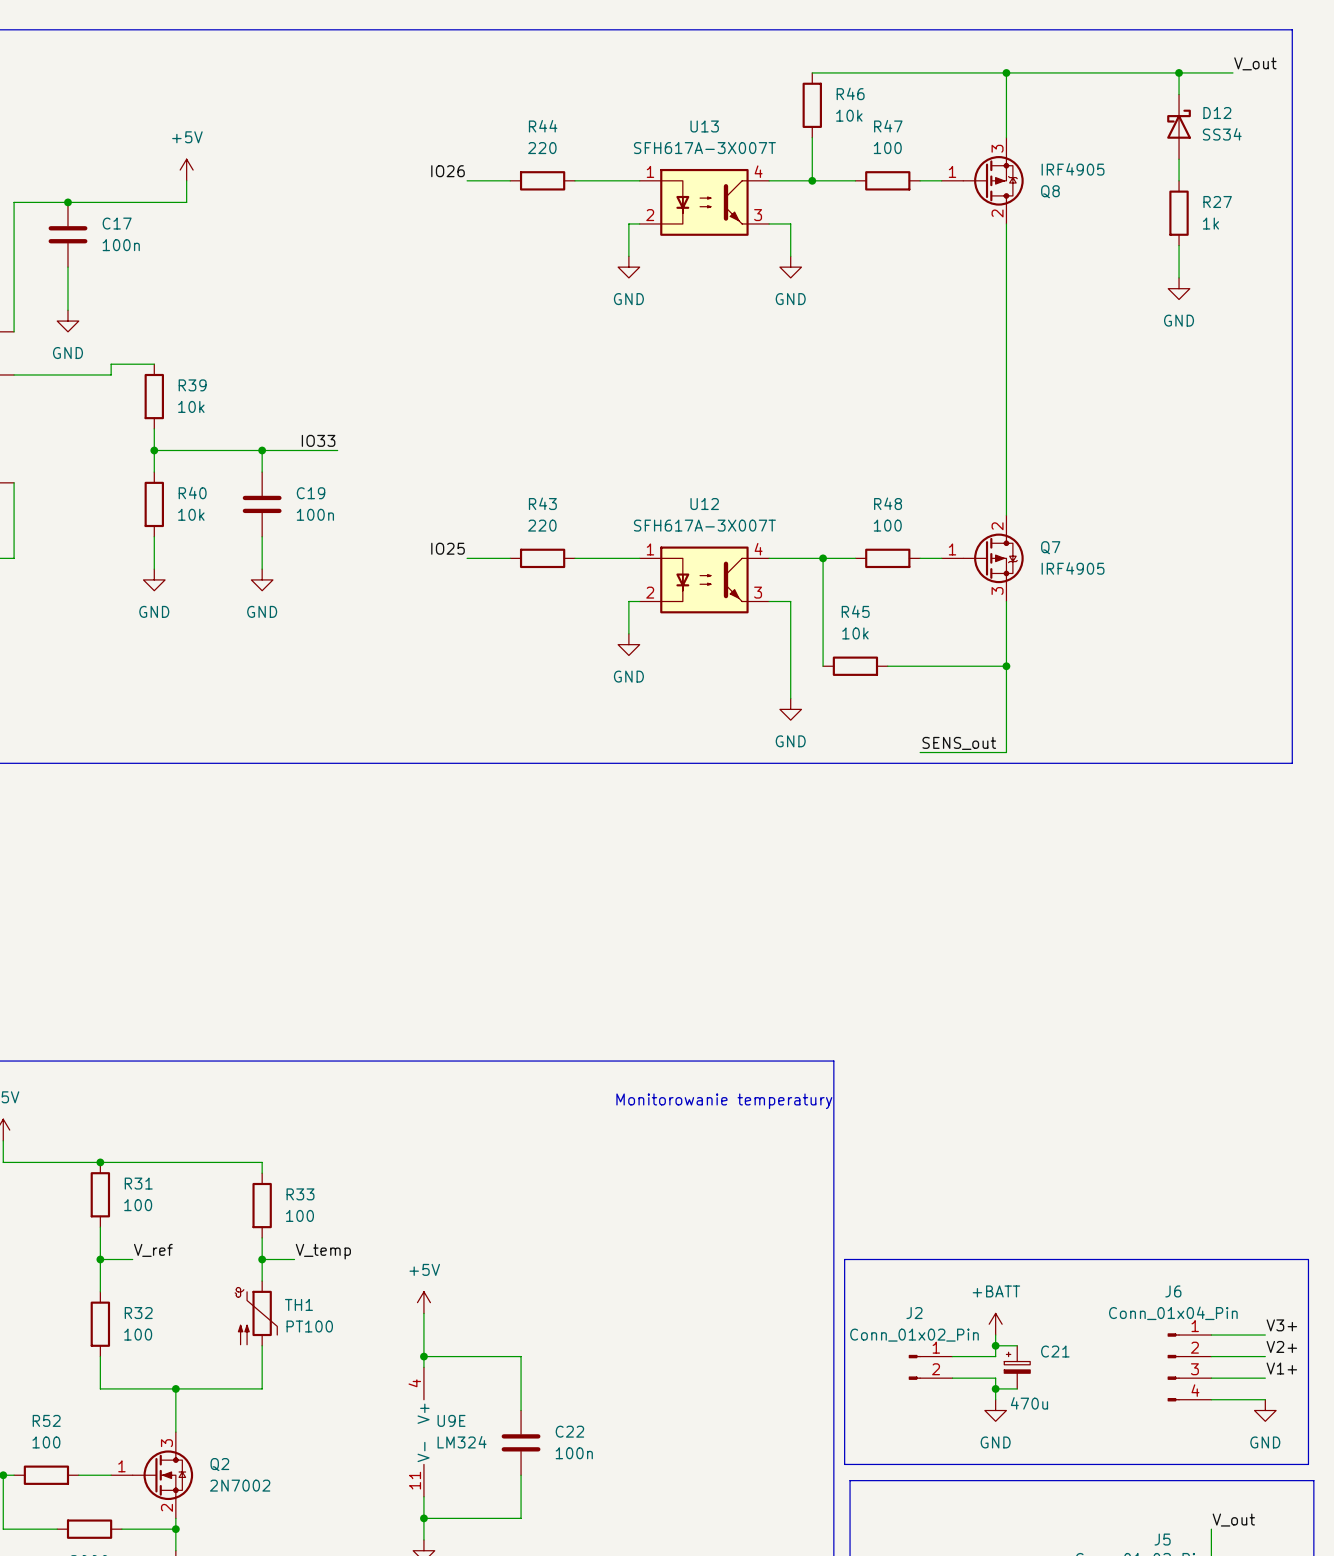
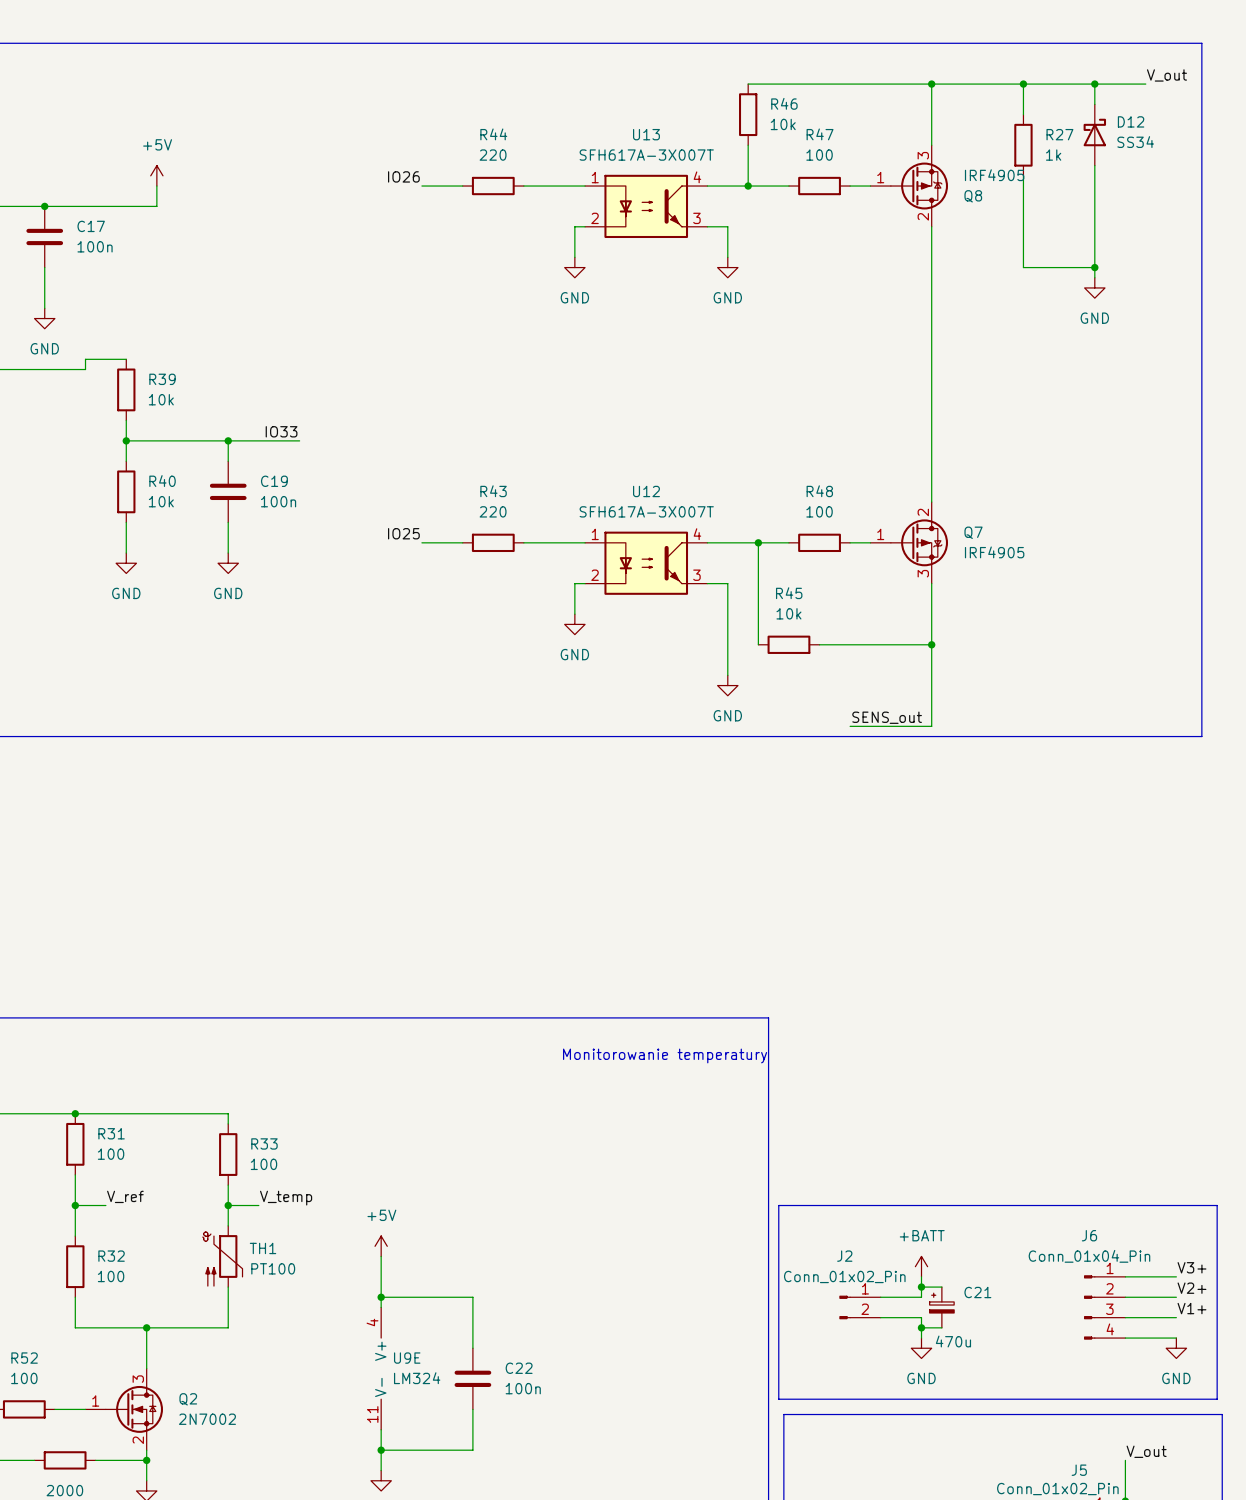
wire: none -> (1023, 84) (1023, 114)
junction: none -> (1023, 84)
wire: none -> (1023, 175) (1023, 267) (1094, 267)
wire: none -> (1094, 186) (1094, 247)
R27 position: (1179, 213) -> (1023, 145)
junction: none -> (1094, 267)

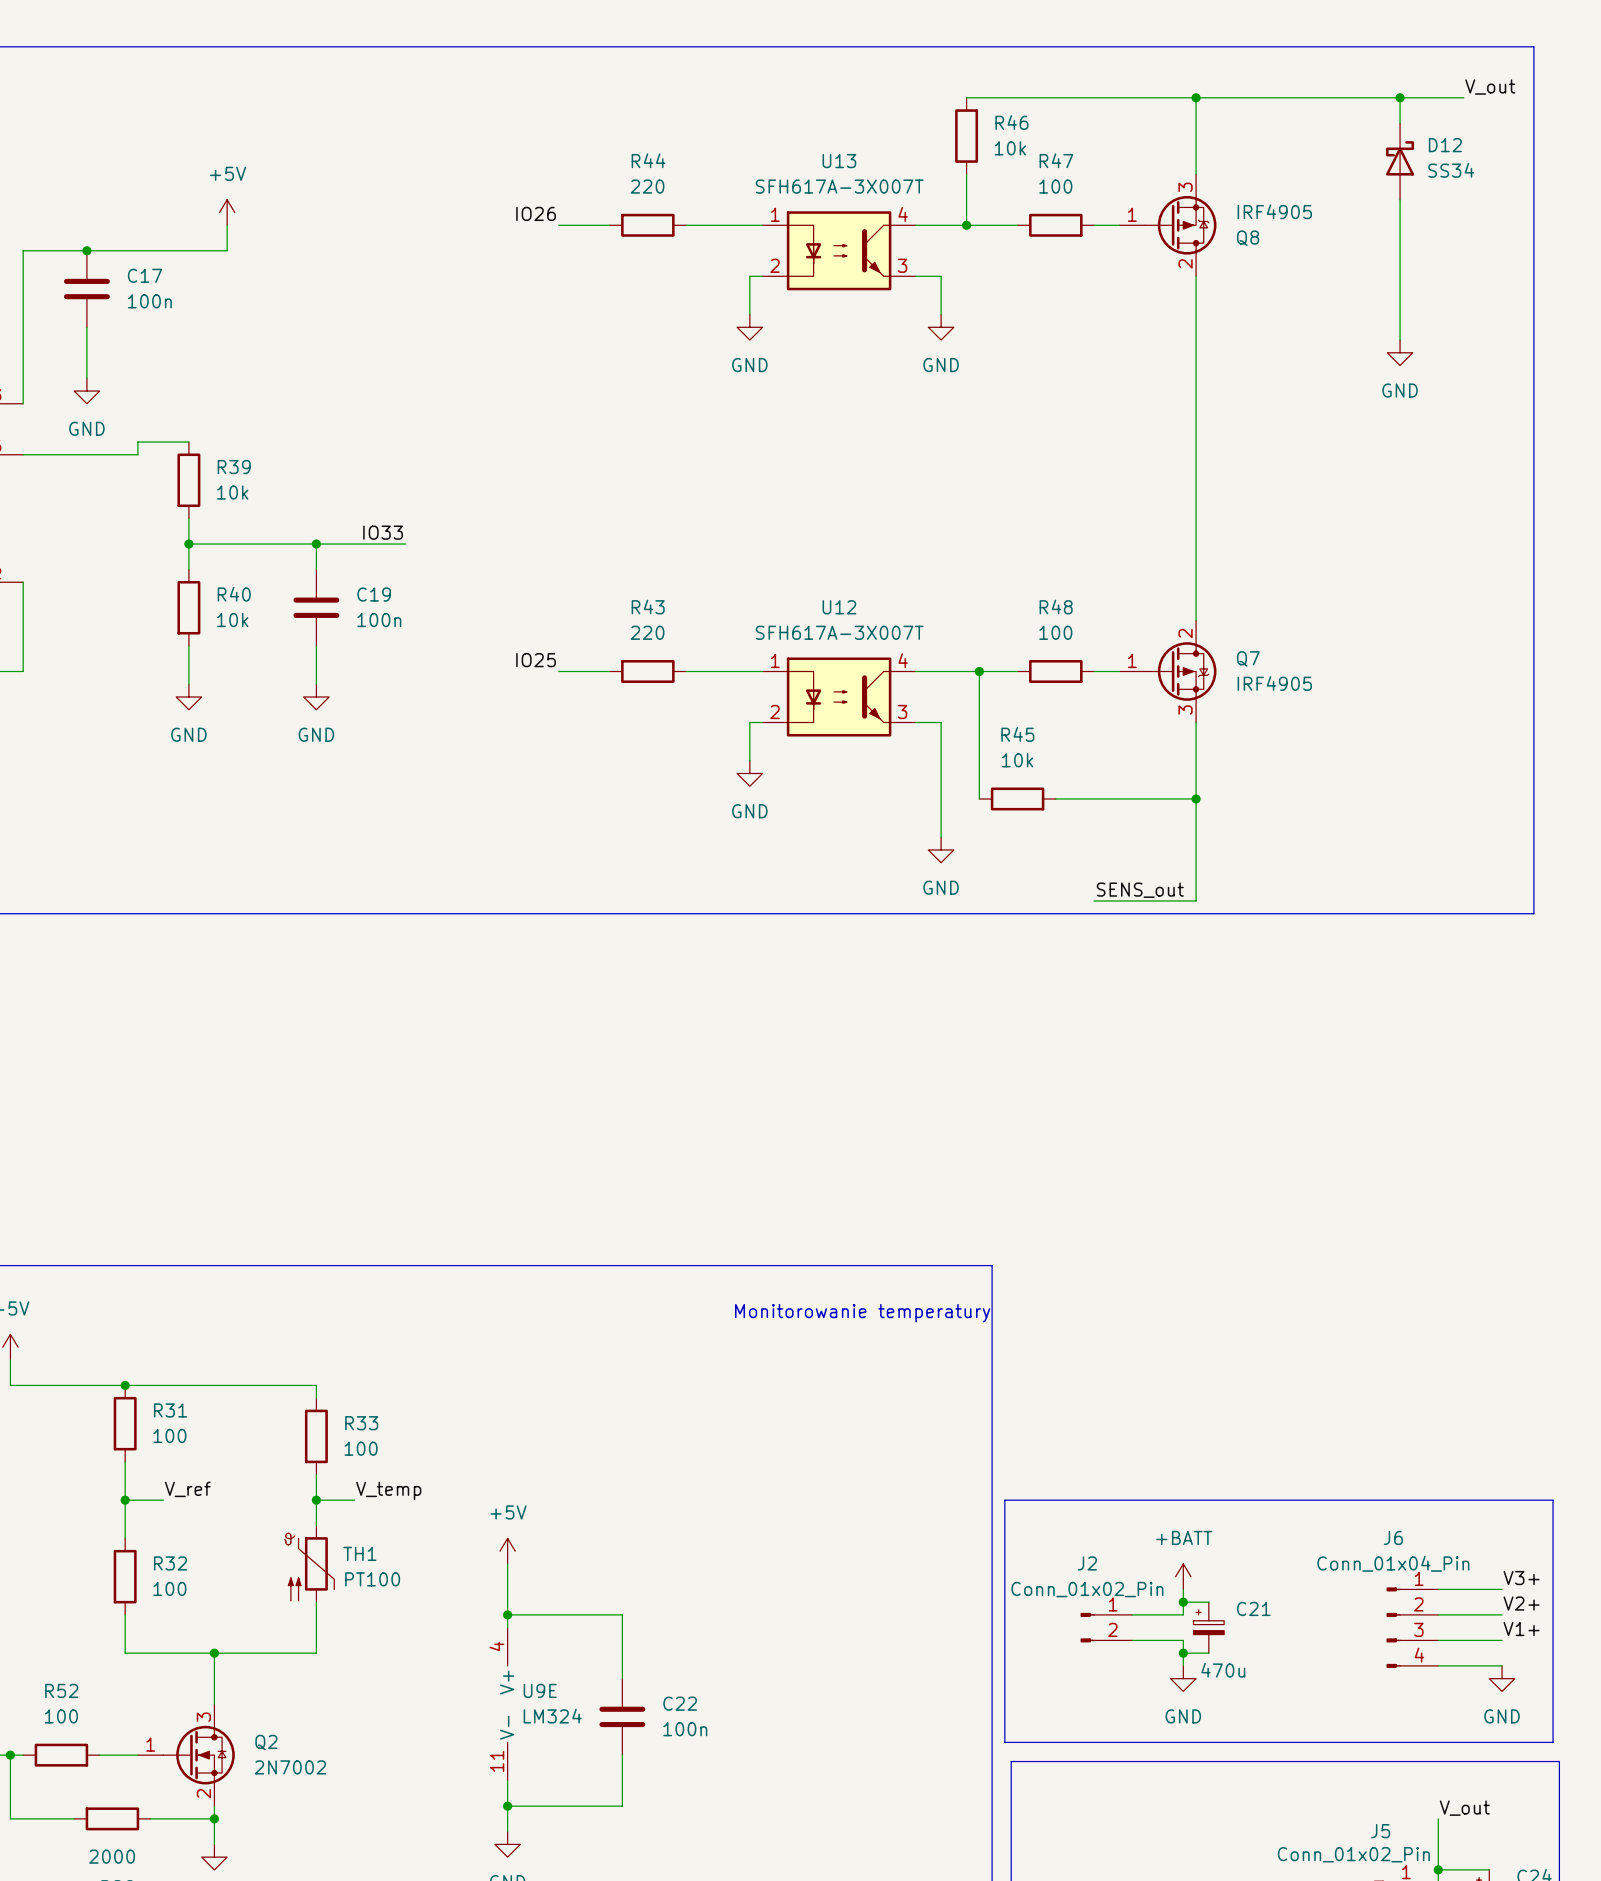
wire: (1023, 84) (1023, 114) -> none
junction: (1023, 84) -> none
R27: 1k (1023, 145) -> none
wire: (1023, 175) (1023, 267) (1094, 267) -> none
junction: (1094, 267) -> none

